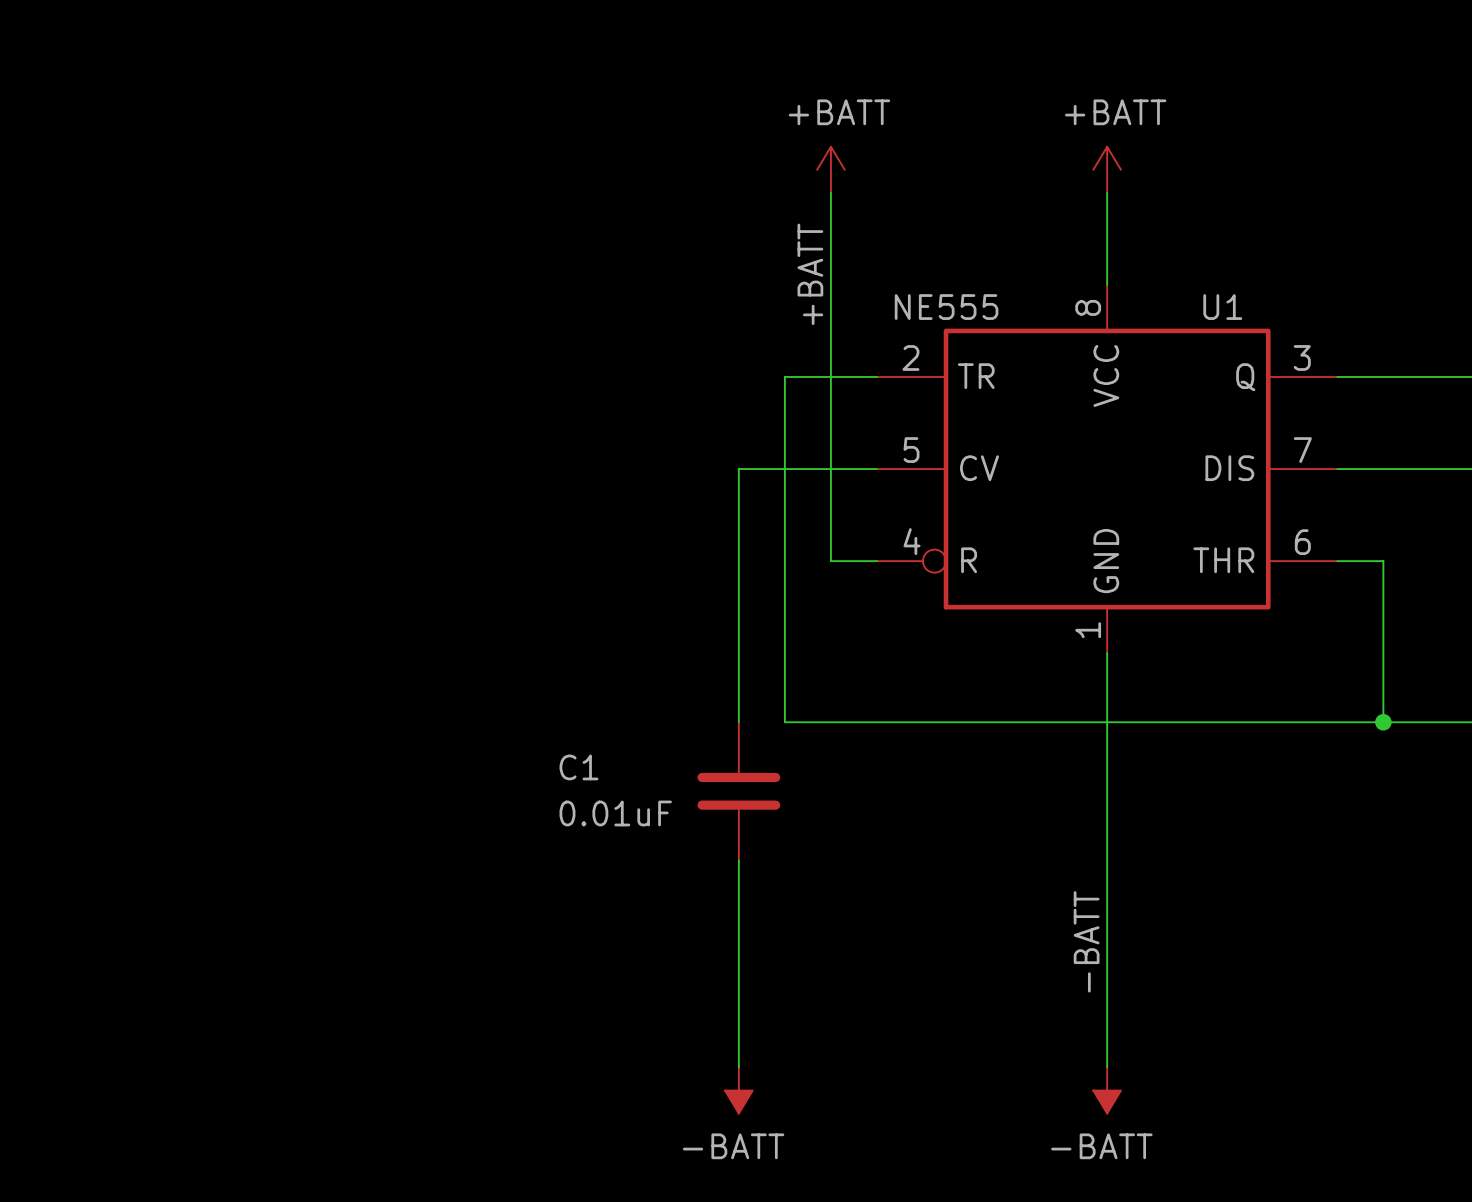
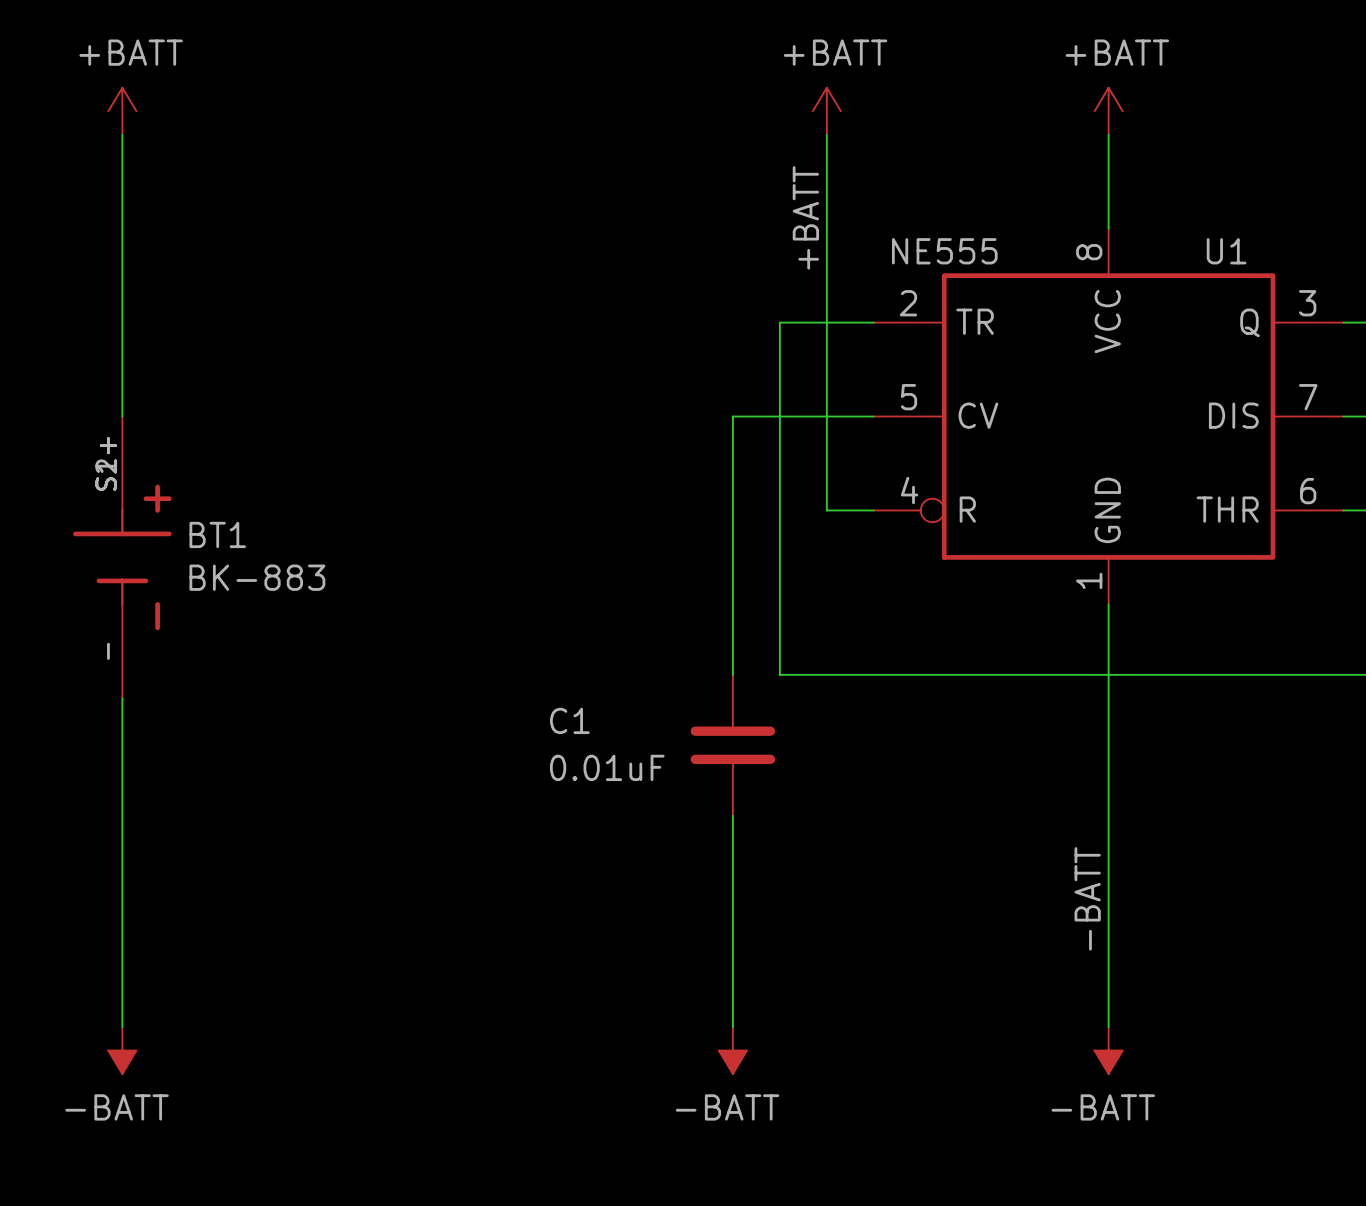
power symbol: none -> +BATT (122, 111)
wire: none -> (122, 134) (122, 416)
BT1: none -> BK-883 (122, 557)
wire: none -> (122, 698) (122, 1027)
power symbol: none -> -BATT (122, 1050)

